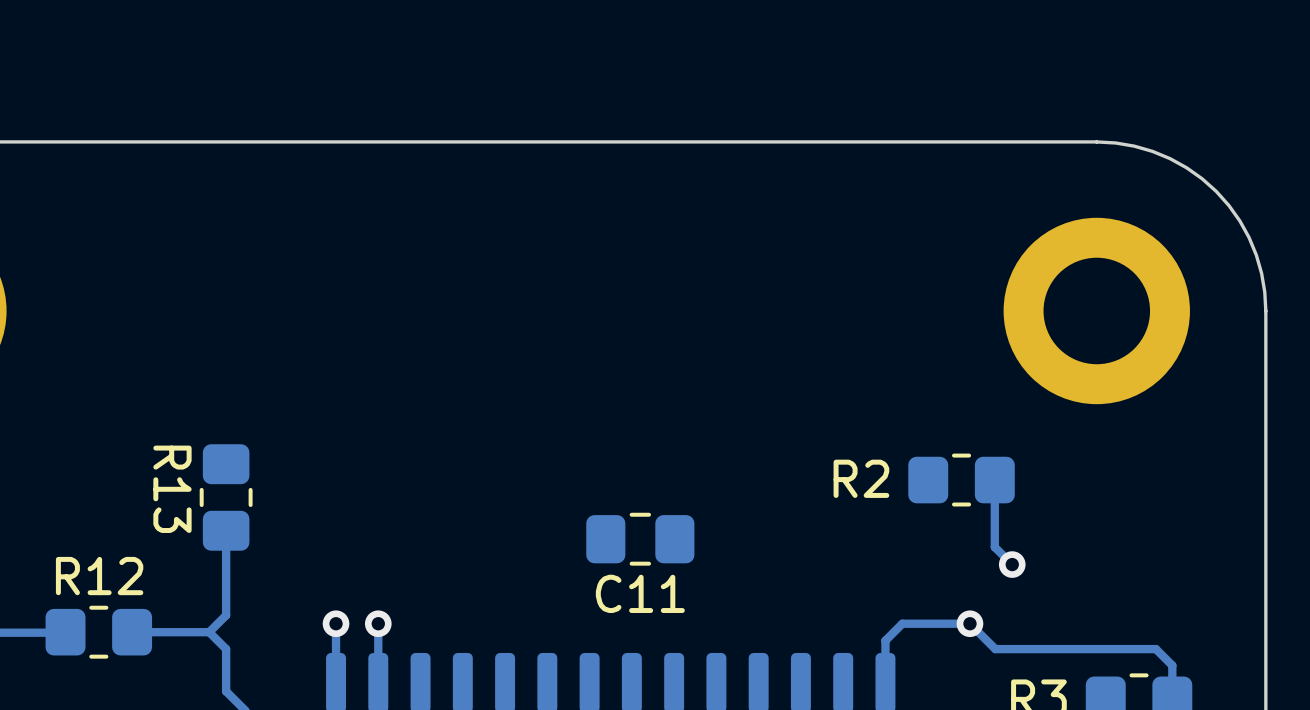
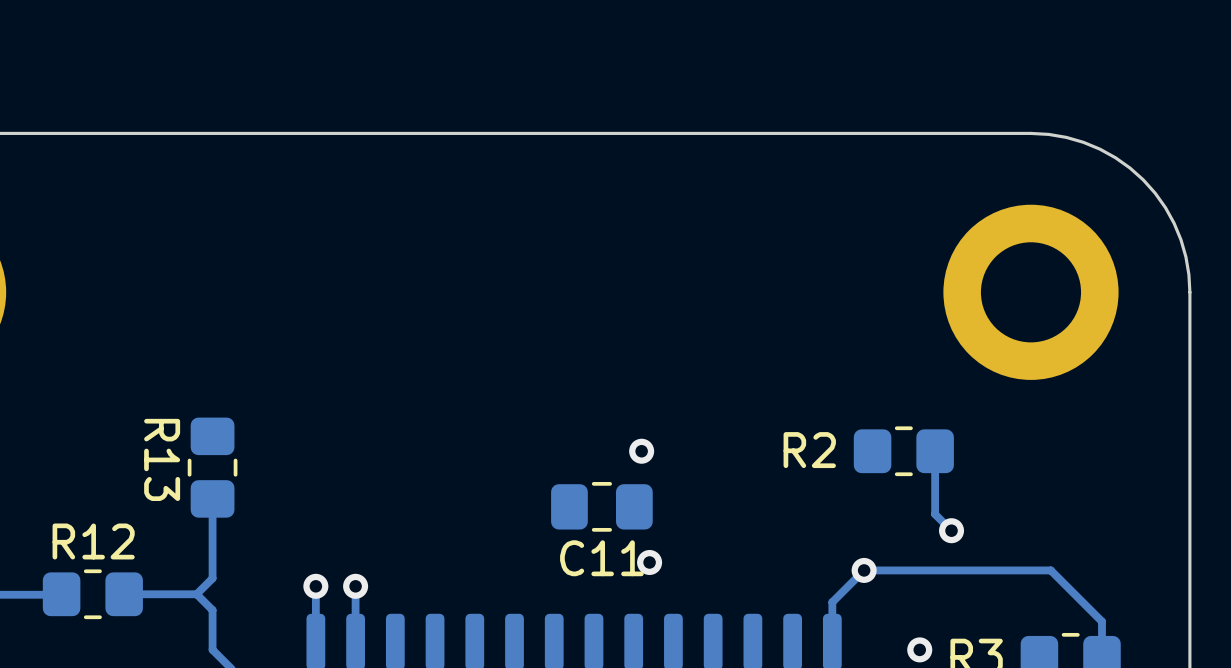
via: none -> (641, 451)
via: none -> (649, 562)
via: none -> (864, 570)
track: (902, 623) (969, 623) (995, 649) (1155, 649) (1172, 665) -> (848, 586) (864, 570) (1050, 570) (1101, 621) (1101, 625)
via: (969, 623) -> none
via: none -> (919, 649)

